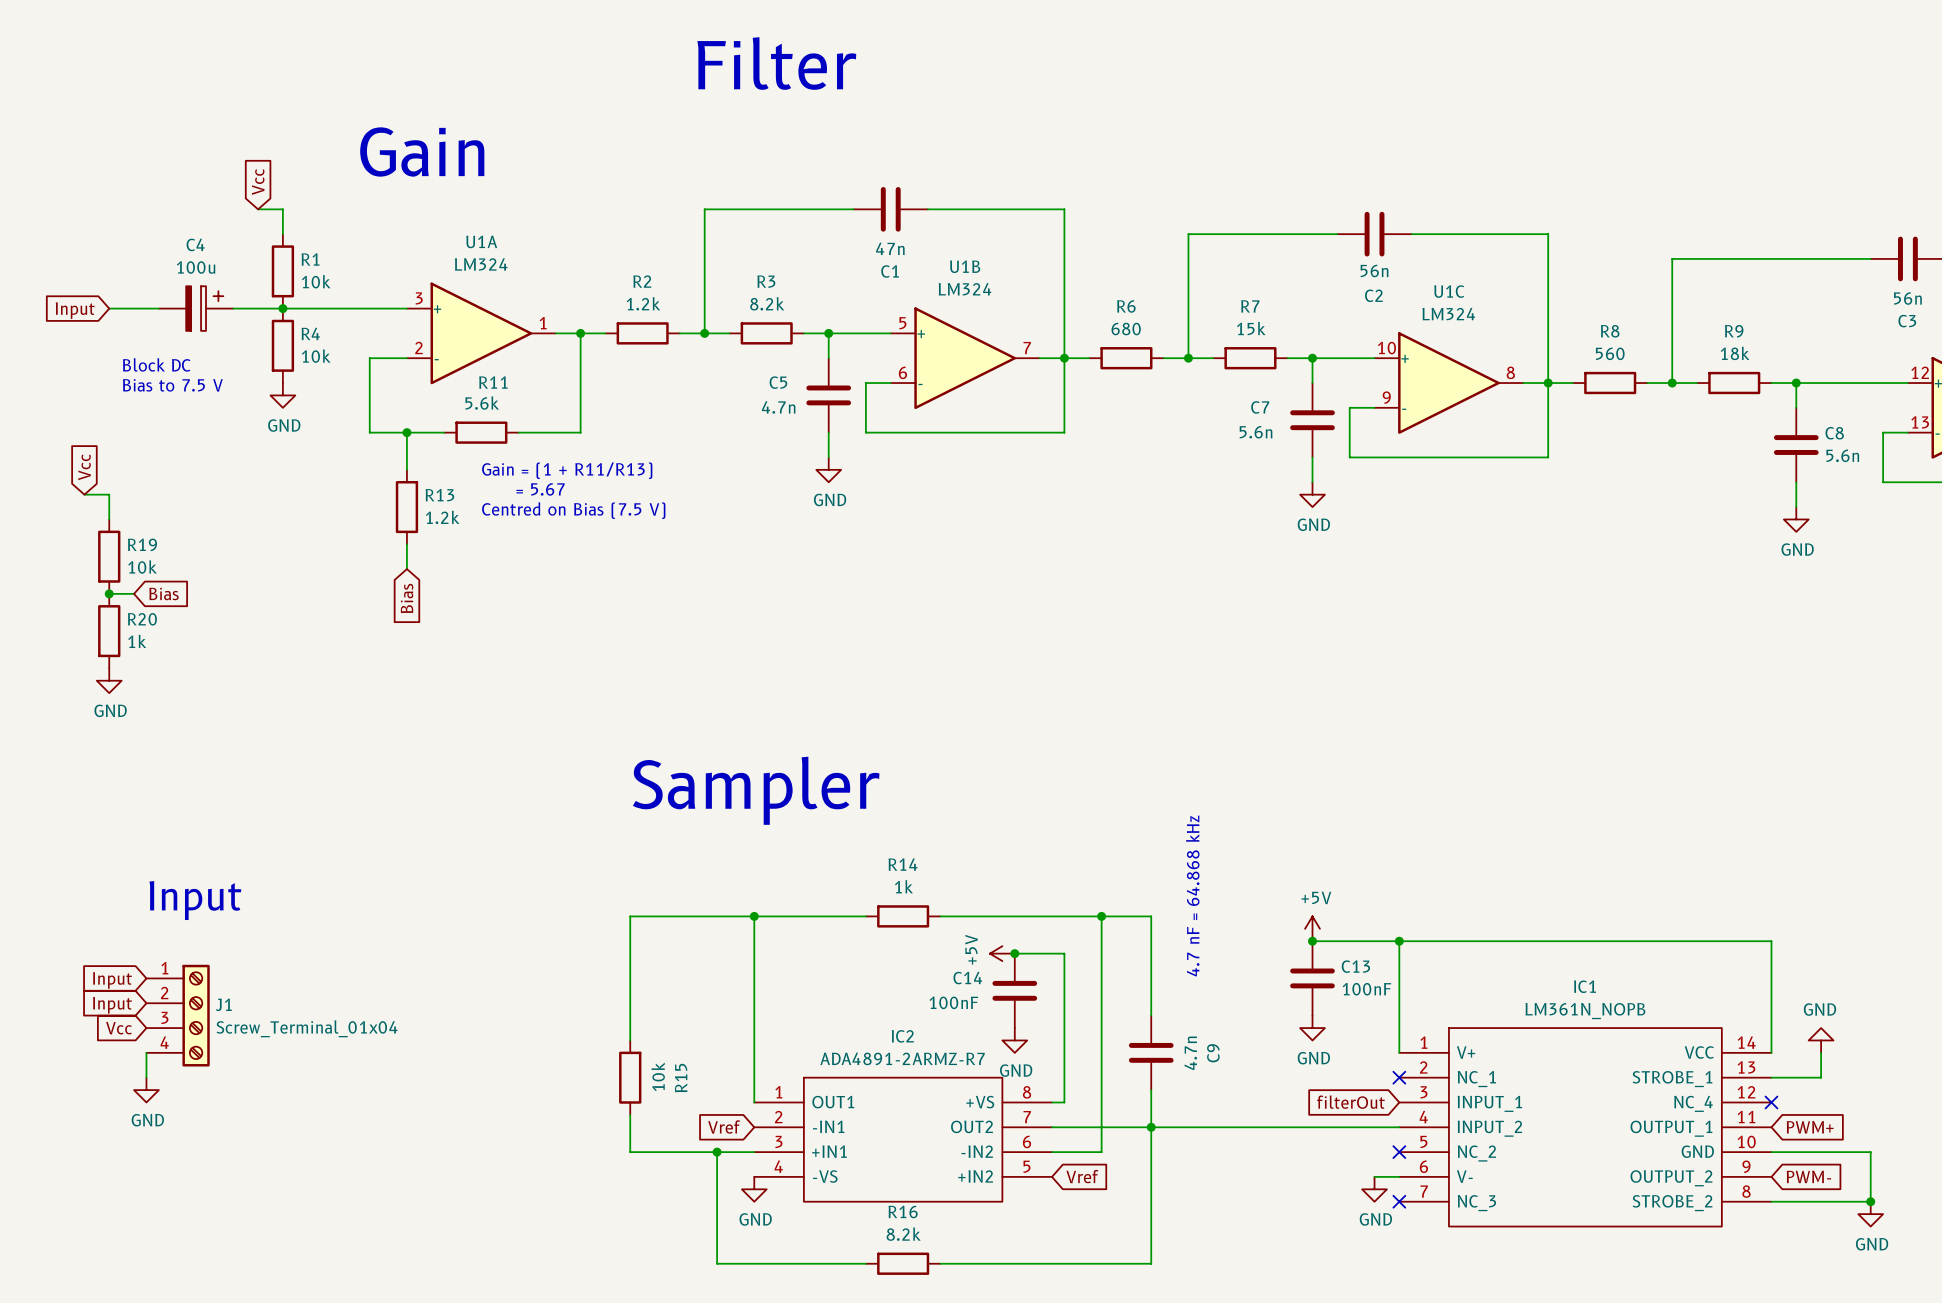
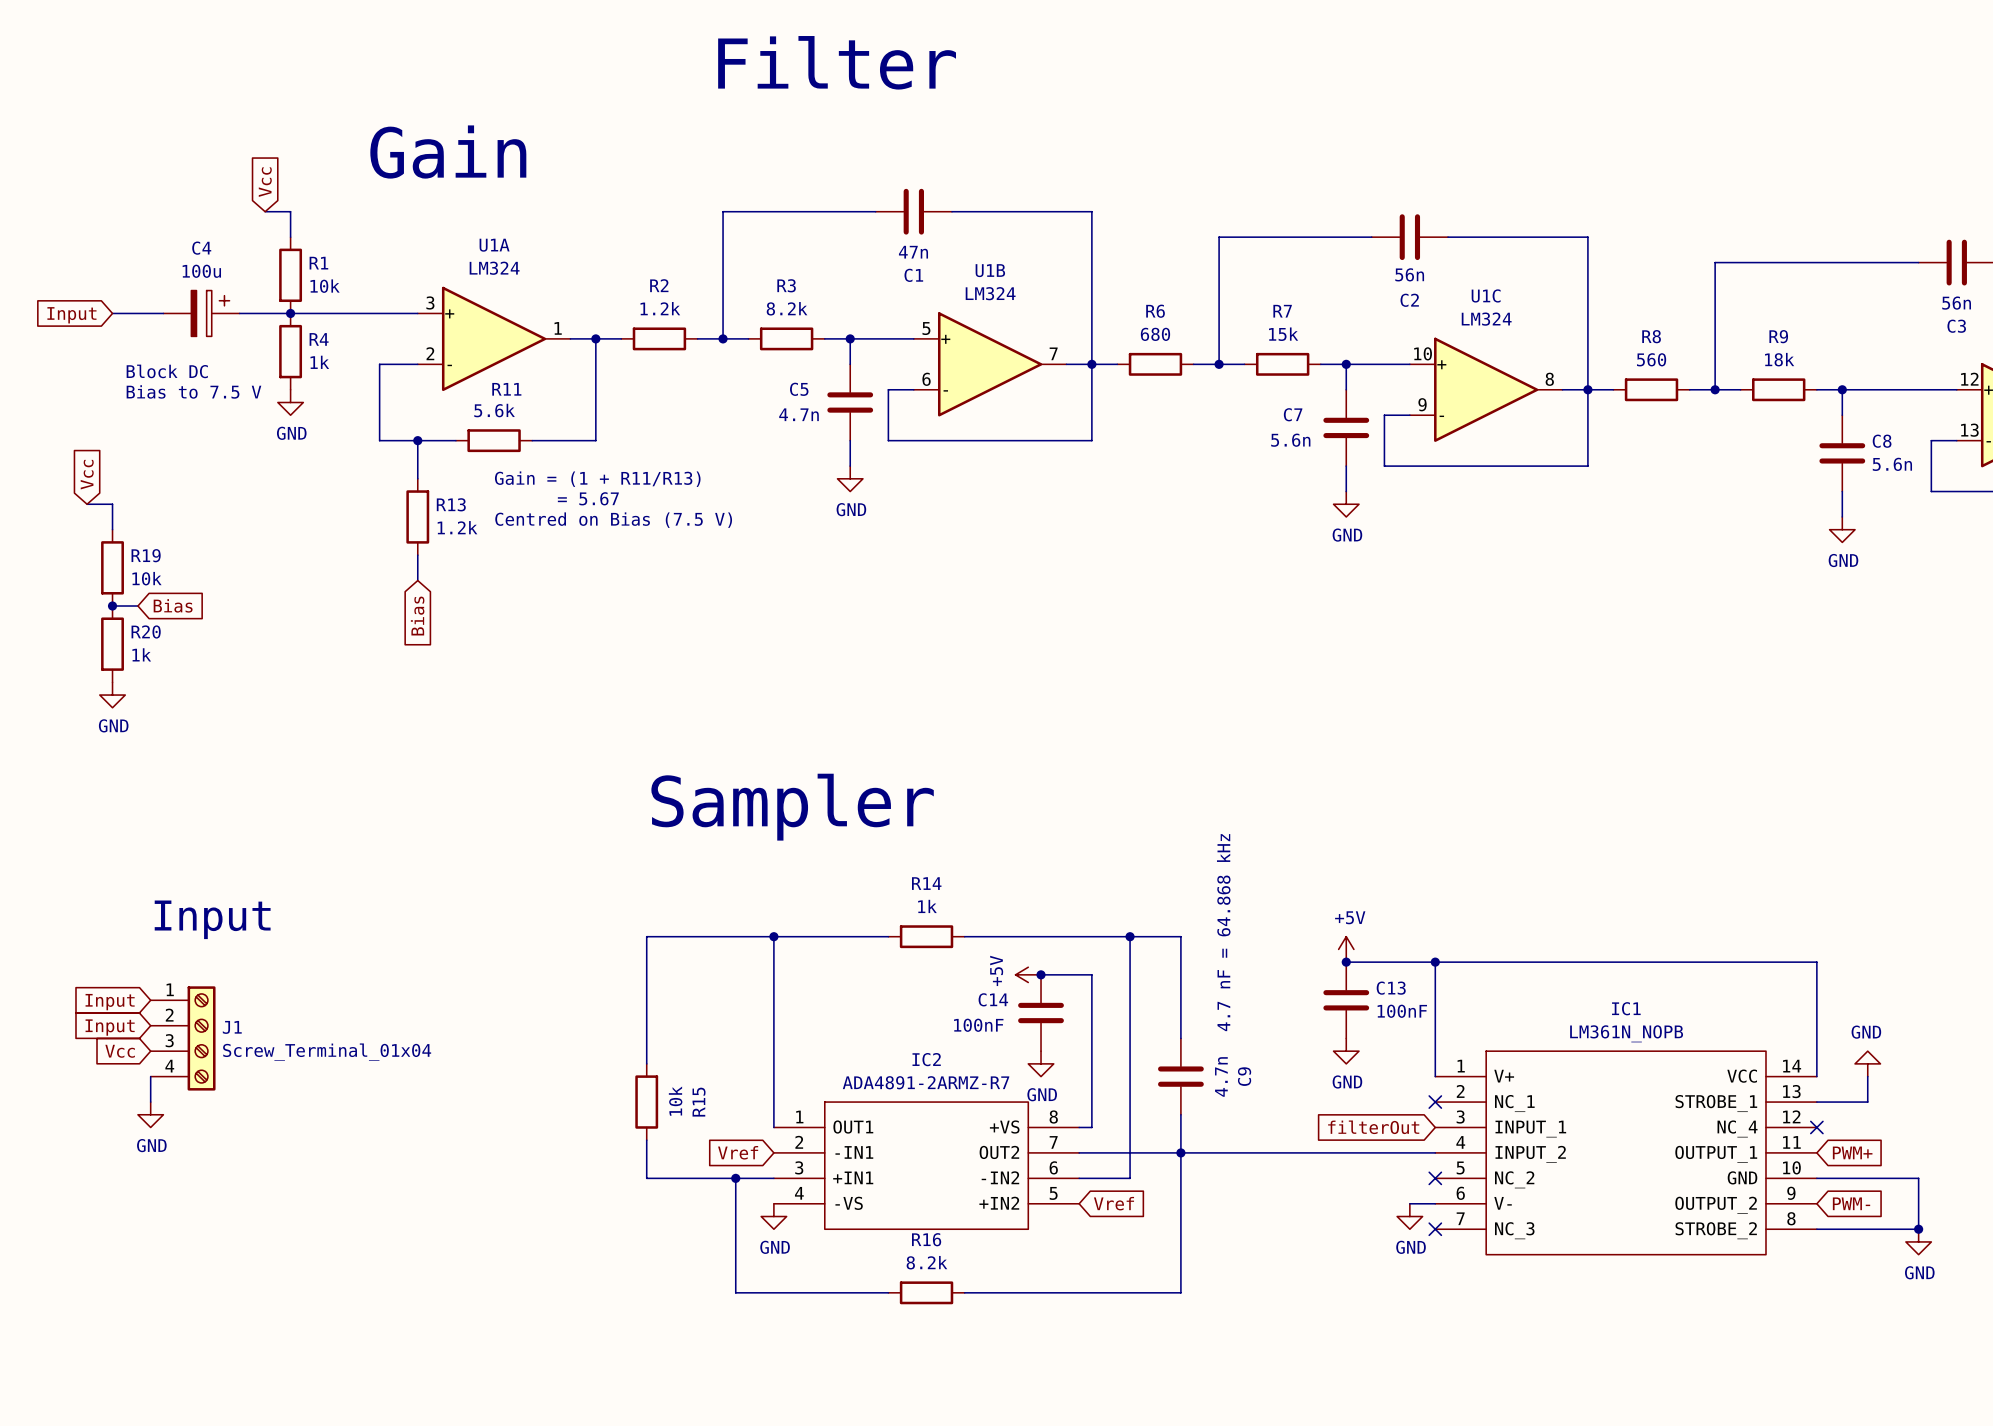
R4 value: 10k (316, 356) -> 1k (319, 362)

